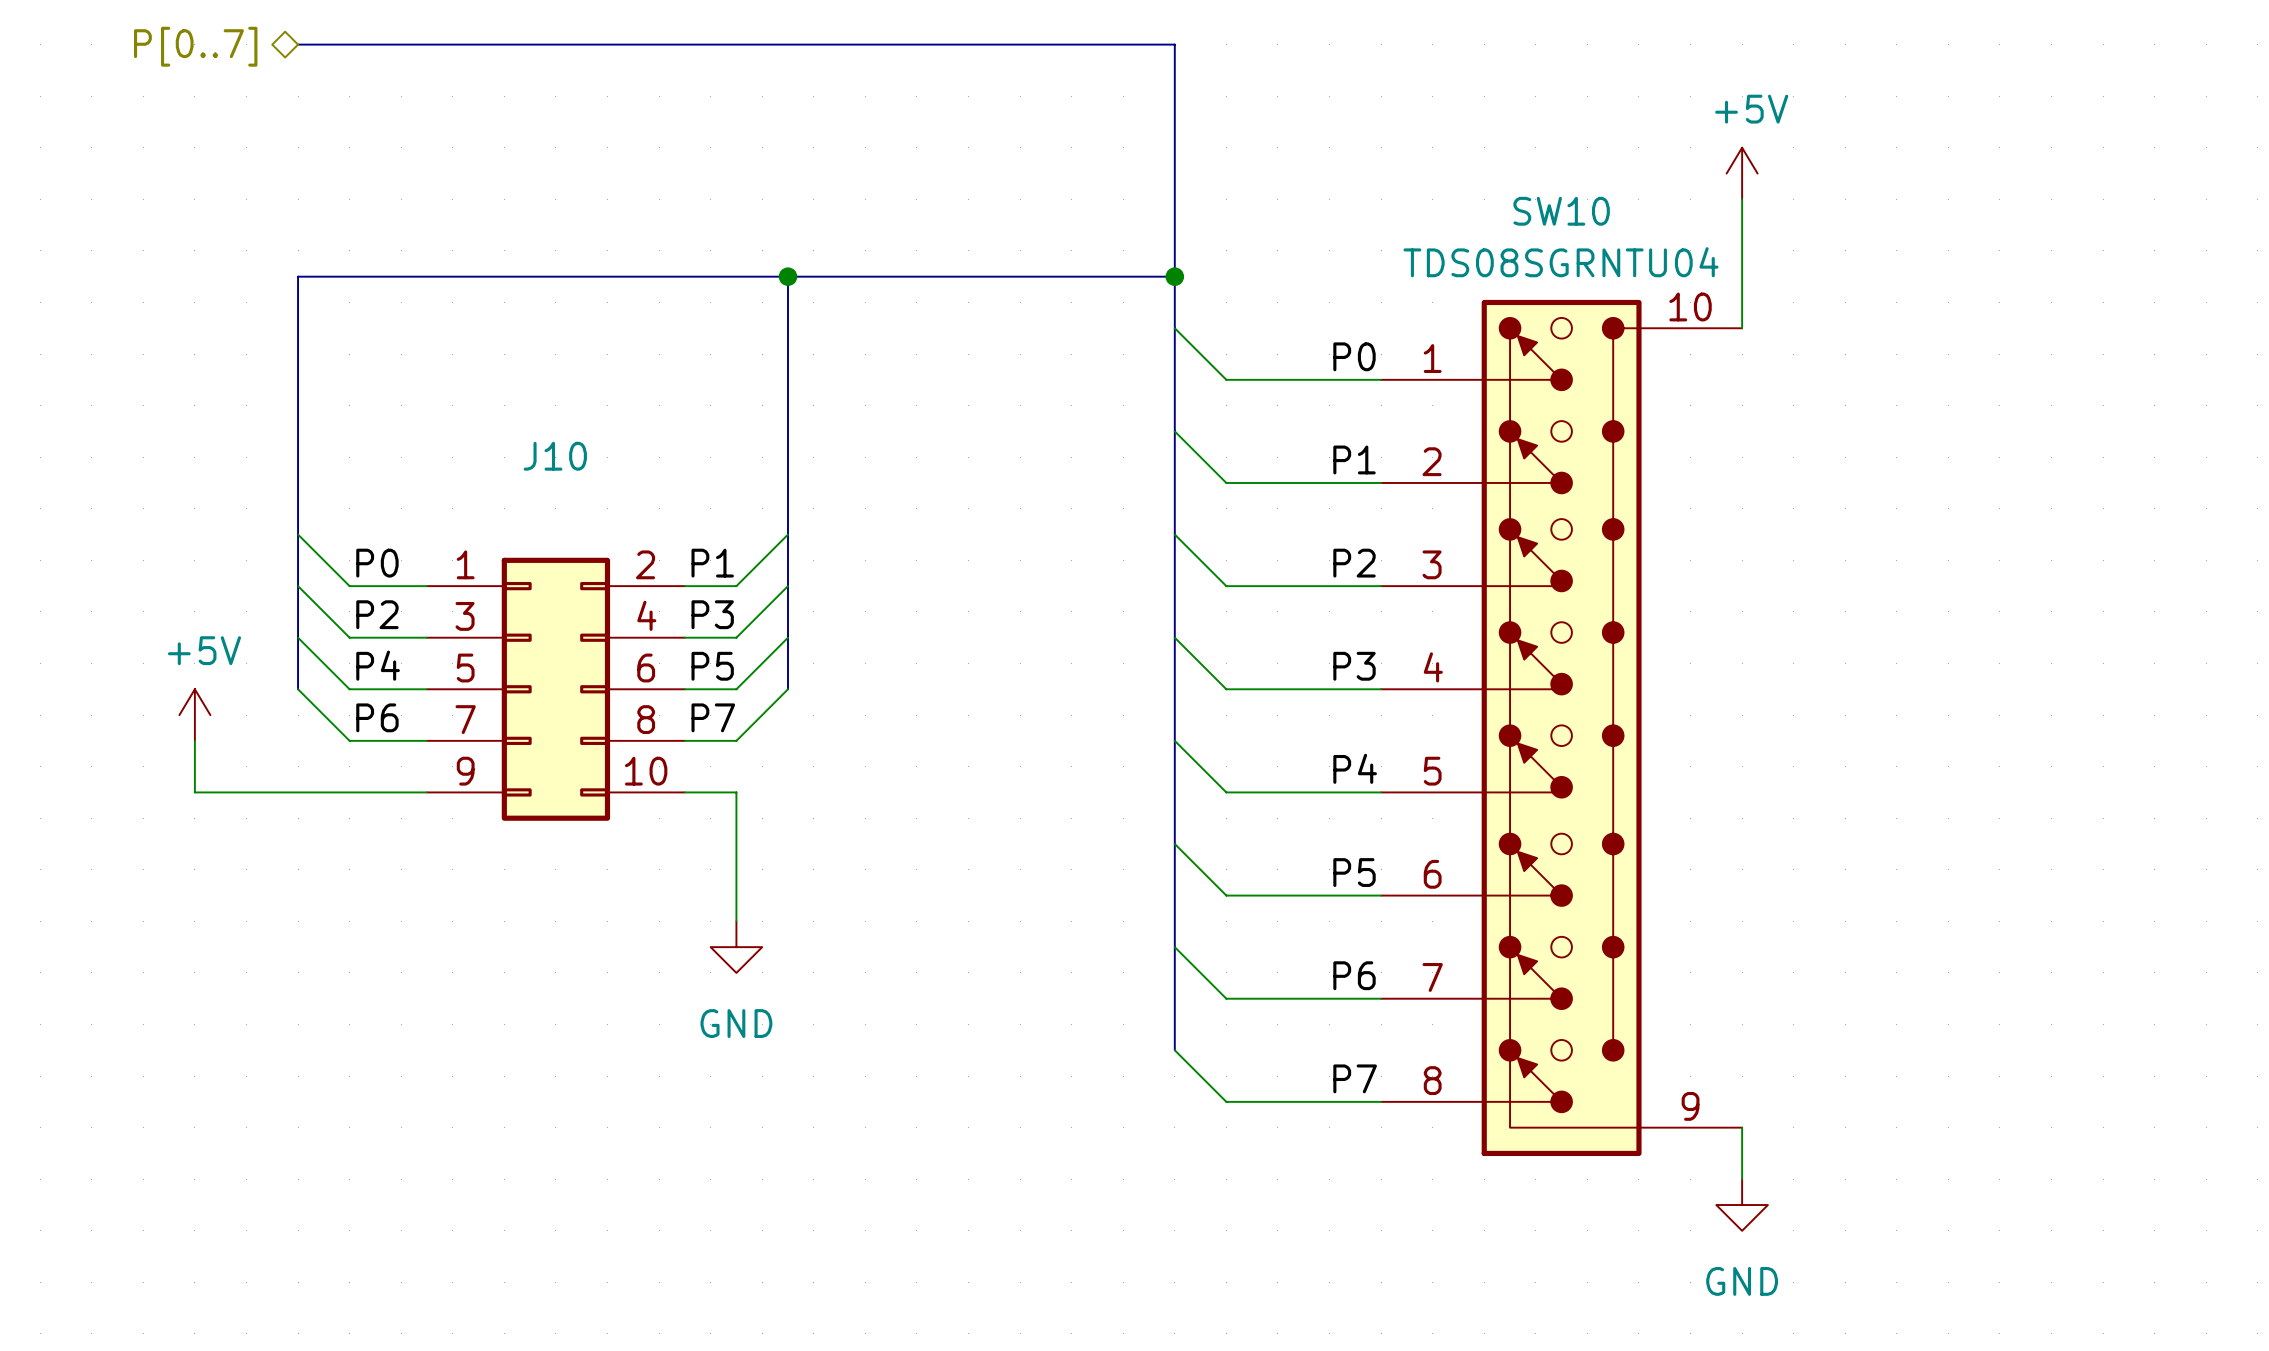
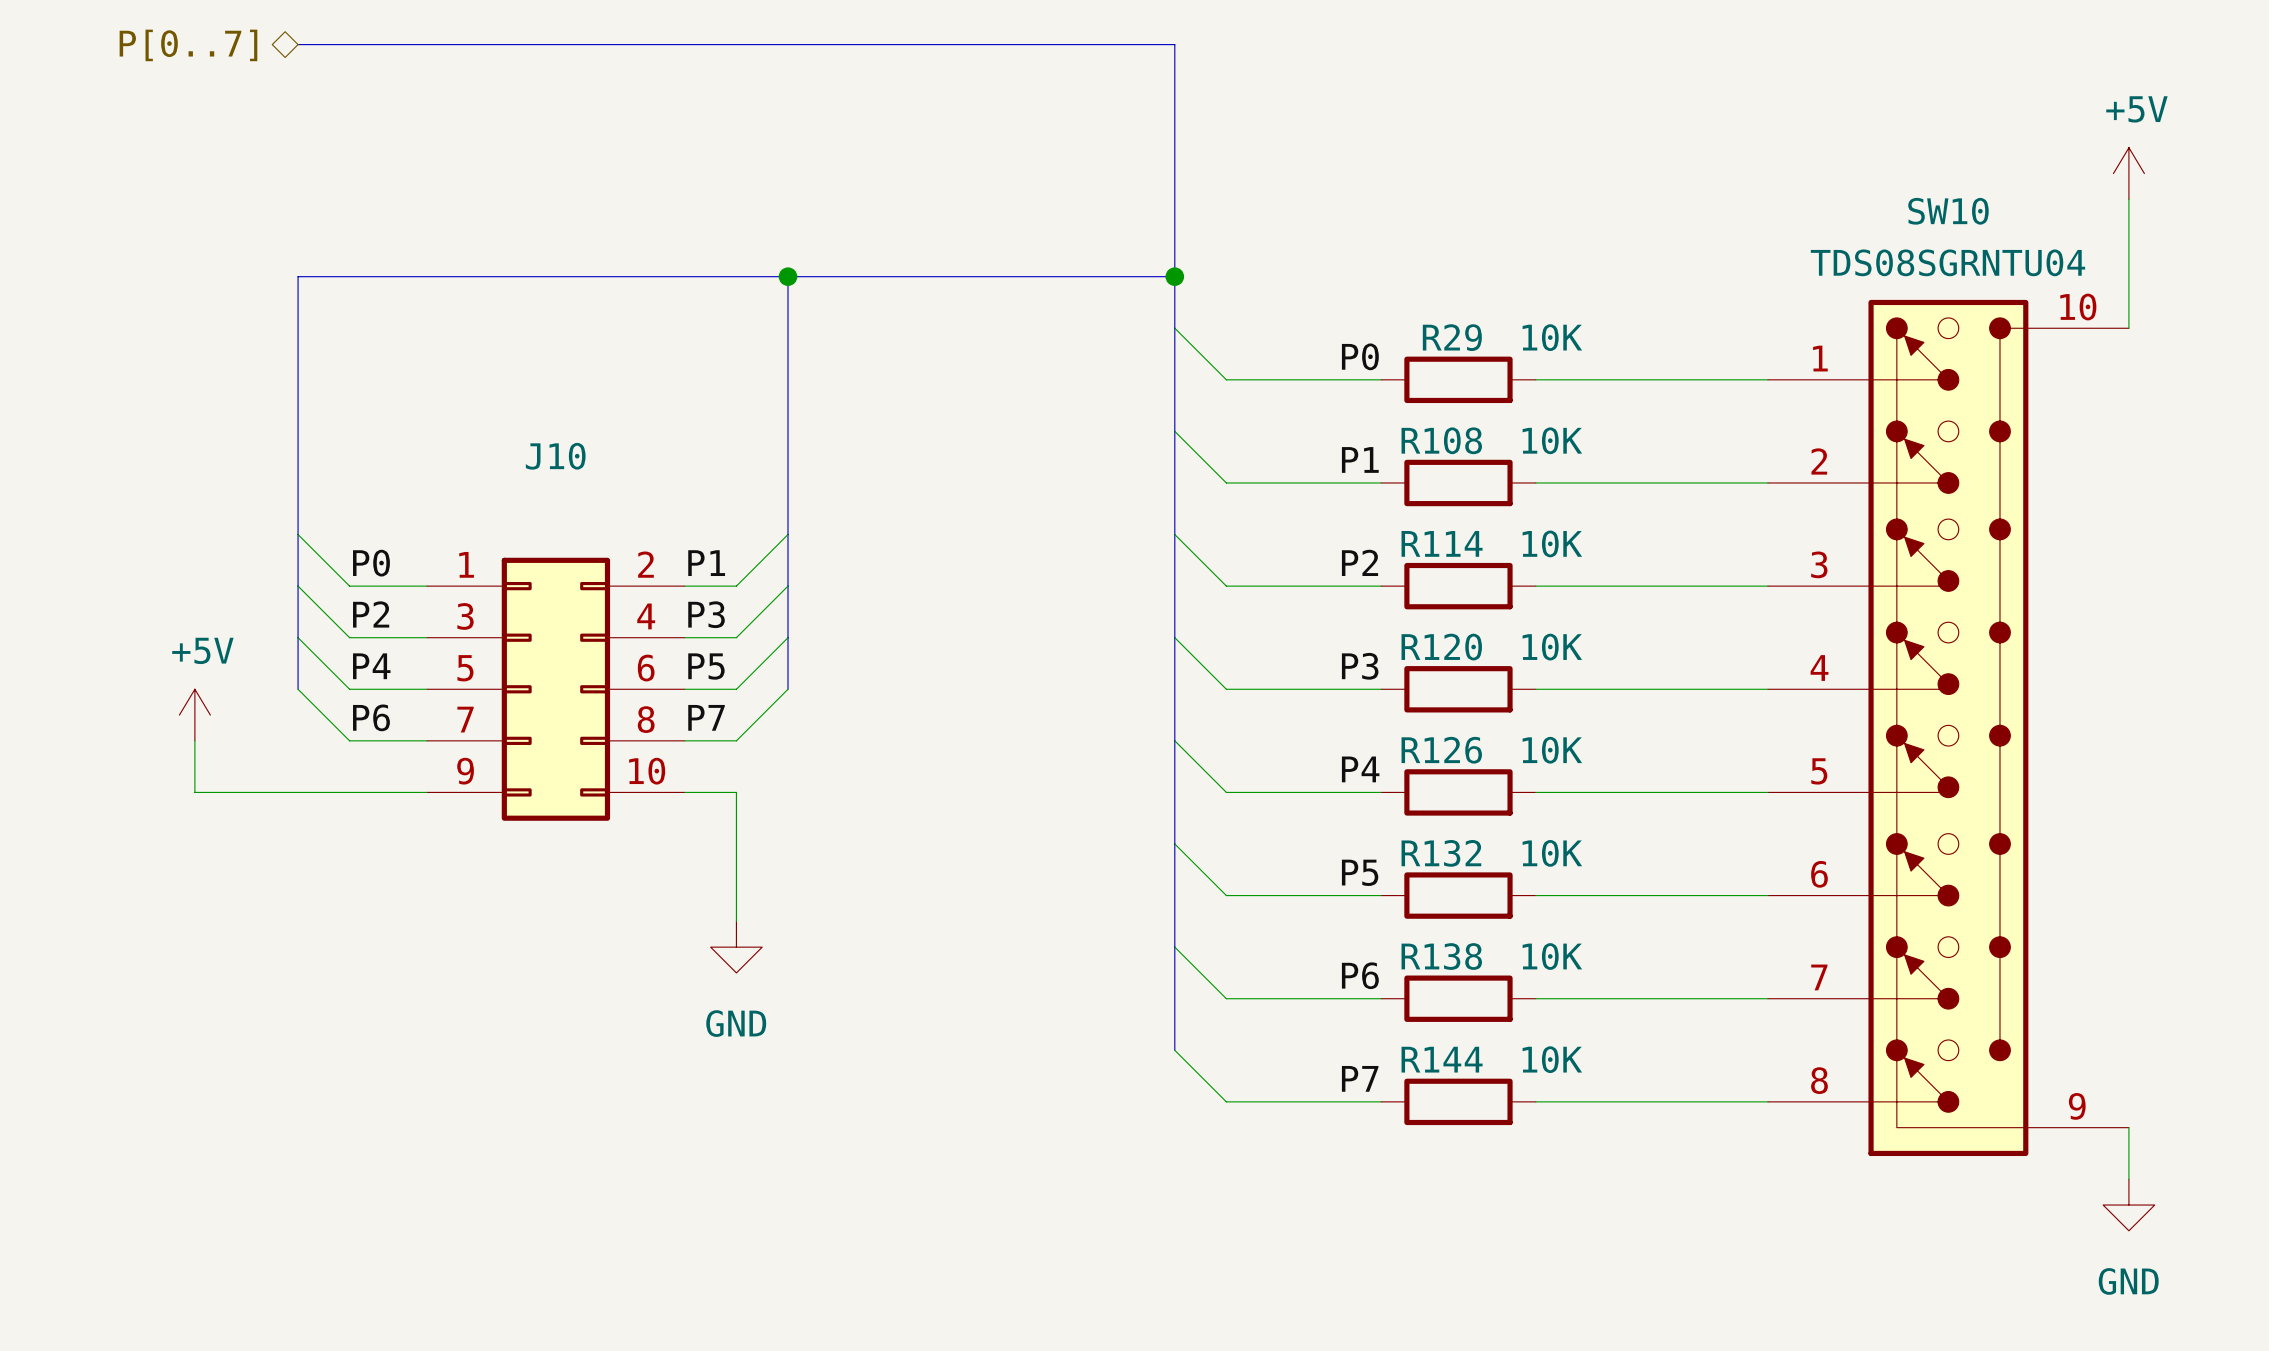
power symbol position: +5V (1742, 173) -> +5V (2128, 173)
wire: (1742, 199) (1742, 328) -> (2128, 199) (2128, 328)
R29: none -> 10K (1458, 379)
wire: none -> (1535, 379) (1767, 379)
R108: none -> 10K (1458, 482)
wire: none -> (1535, 482) (1767, 482)
R114: none -> 10K (1458, 586)
wire: none -> (1535, 586) (1767, 586)
R120: none -> 10K (1458, 689)
wire: none -> (1535, 689) (1767, 689)
SW10 position: (1561, 727) -> (1948, 727)
R126: none -> 10K (1458, 792)
wire: none -> (1535, 792) (1767, 792)
R132: none -> 10K (1458, 895)
wire: none -> (1535, 895) (1767, 895)
R138: none -> 10K (1458, 998)
wire: none -> (1535, 998) (1767, 998)
R144: none -> 10K (1458, 1101)
wire: none -> (1535, 1101) (1767, 1101)
wire: (1742, 1127) (1742, 1179) -> (2128, 1127) (2128, 1179)
power symbol position: GND (1742, 1205) -> GND (2128, 1205)

